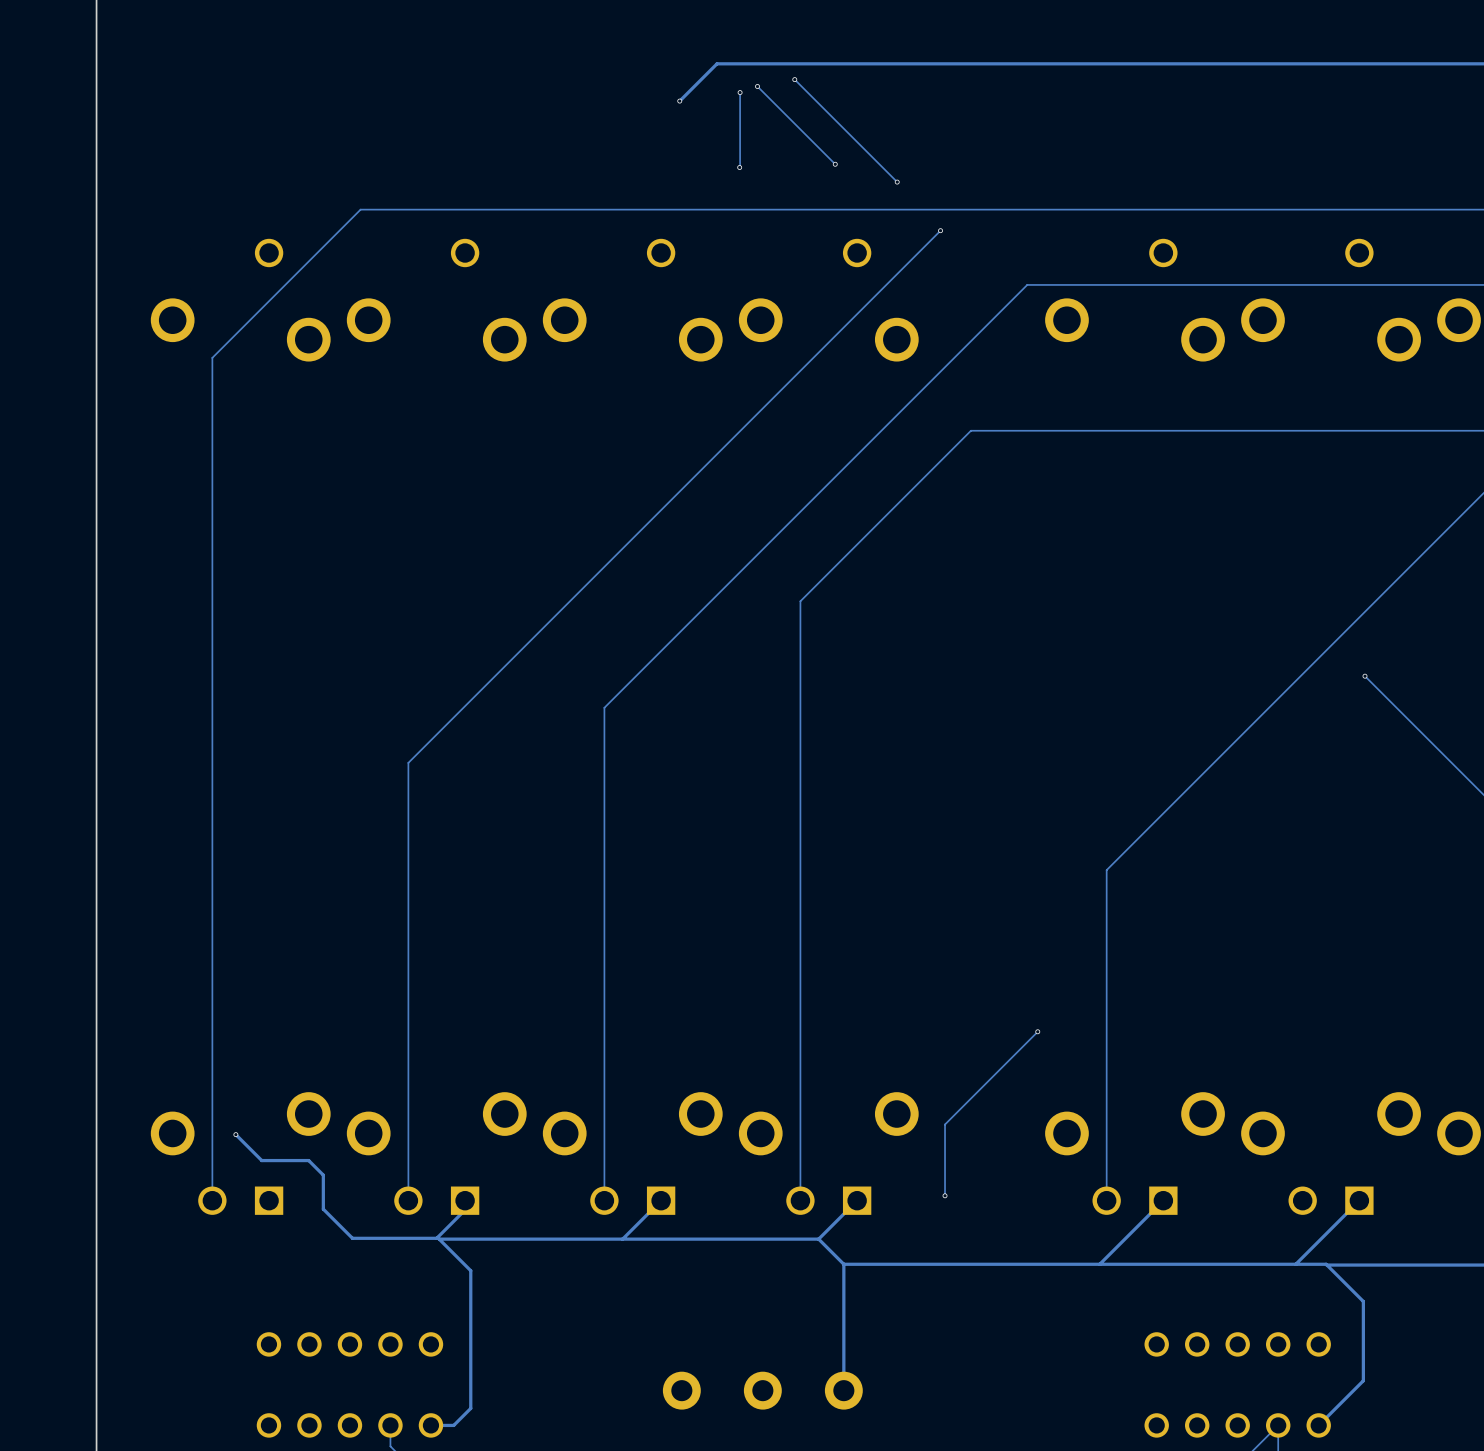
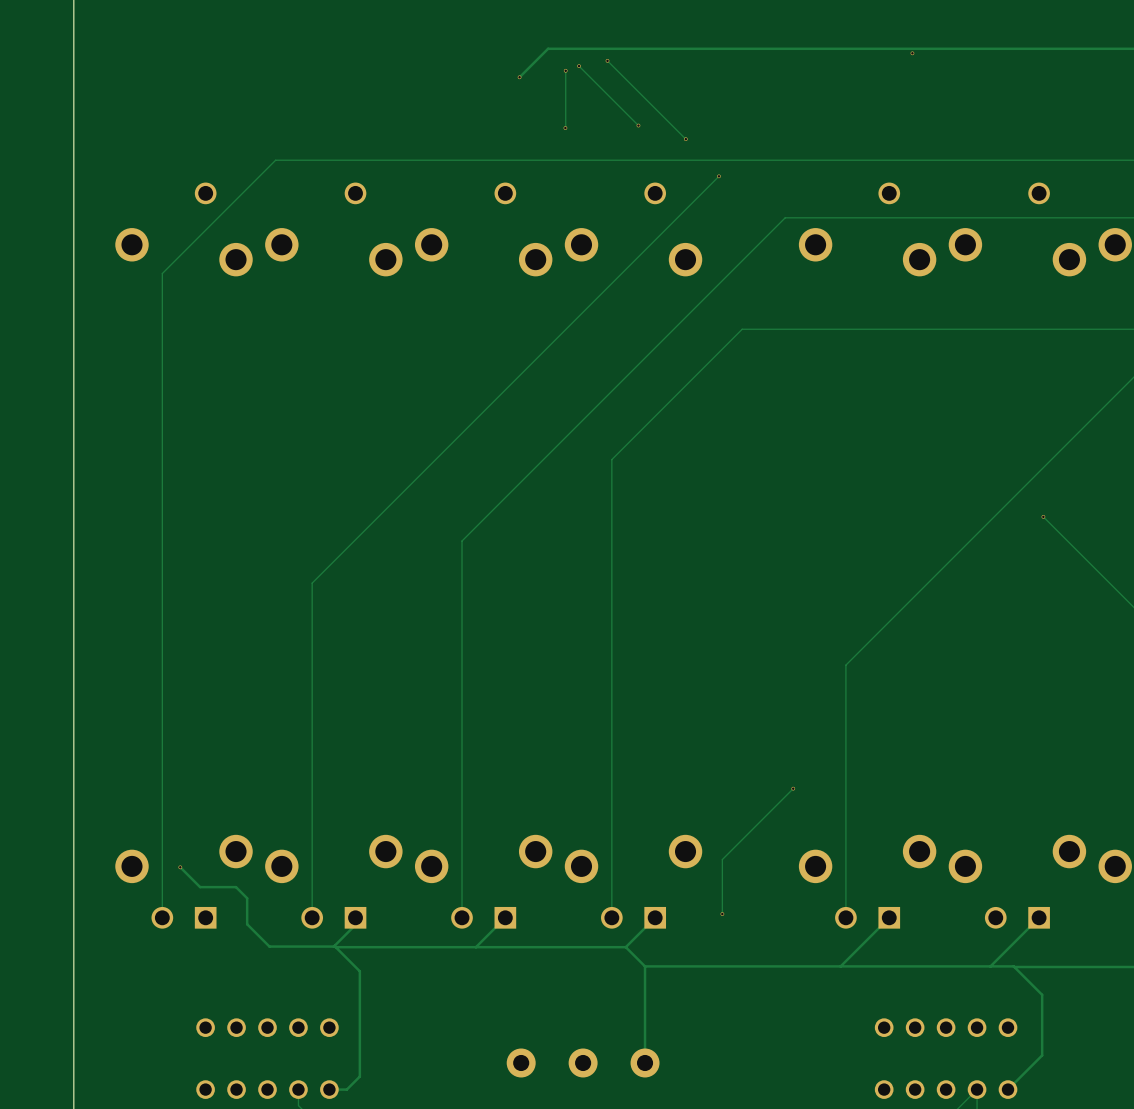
via: none -> (912, 53)

